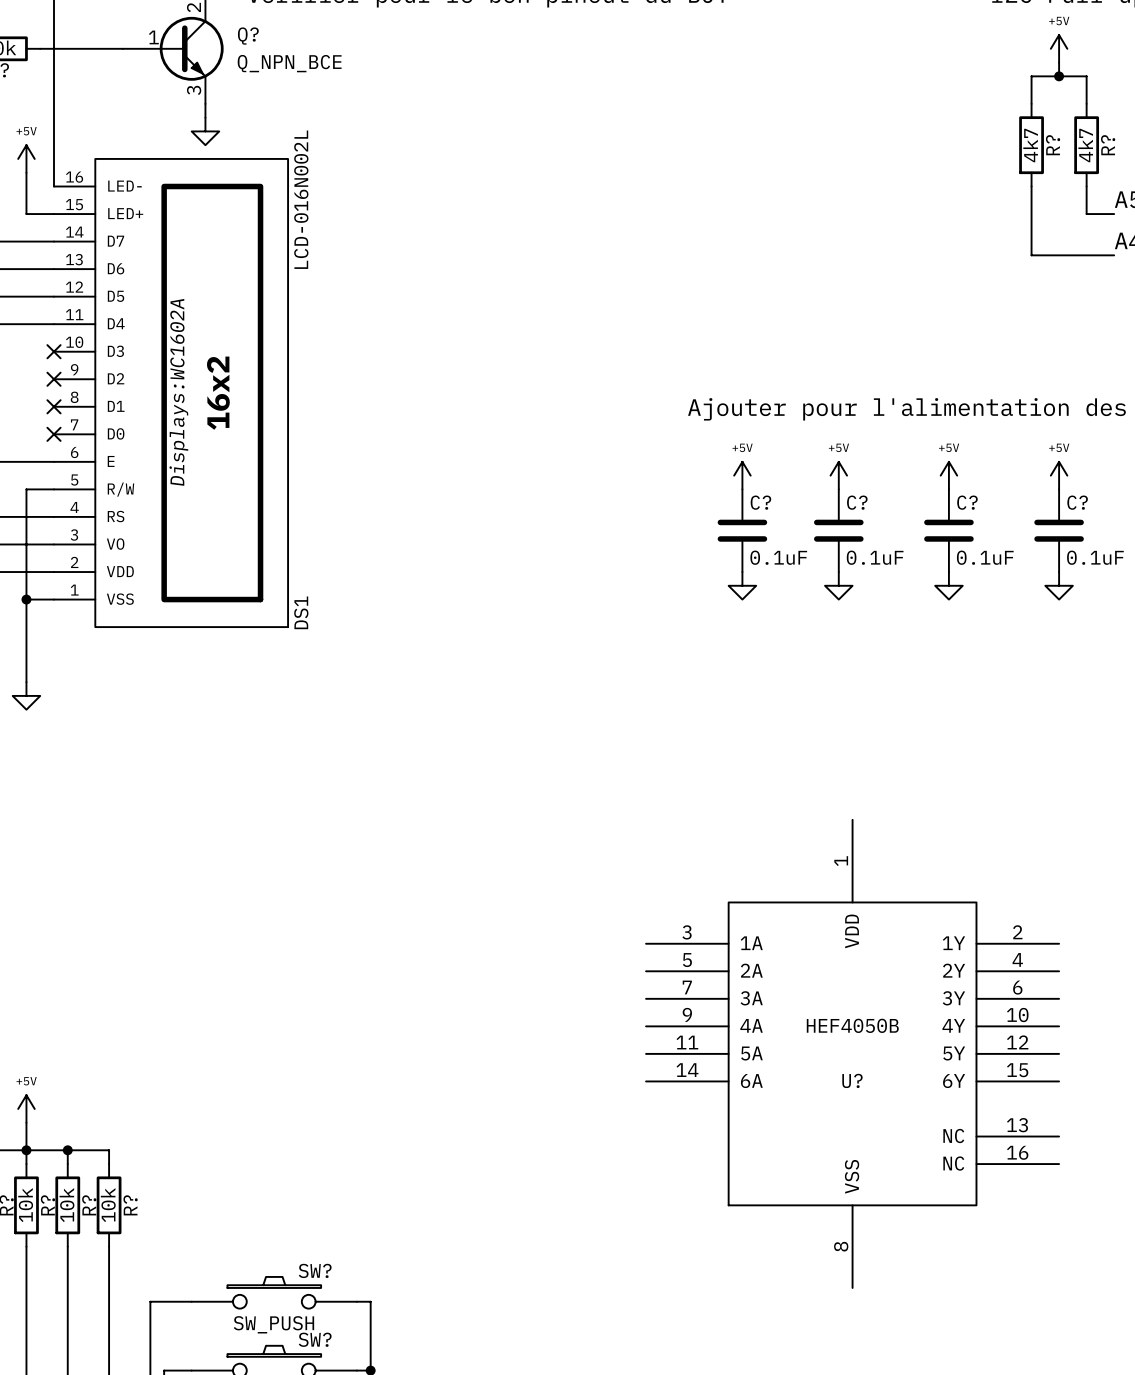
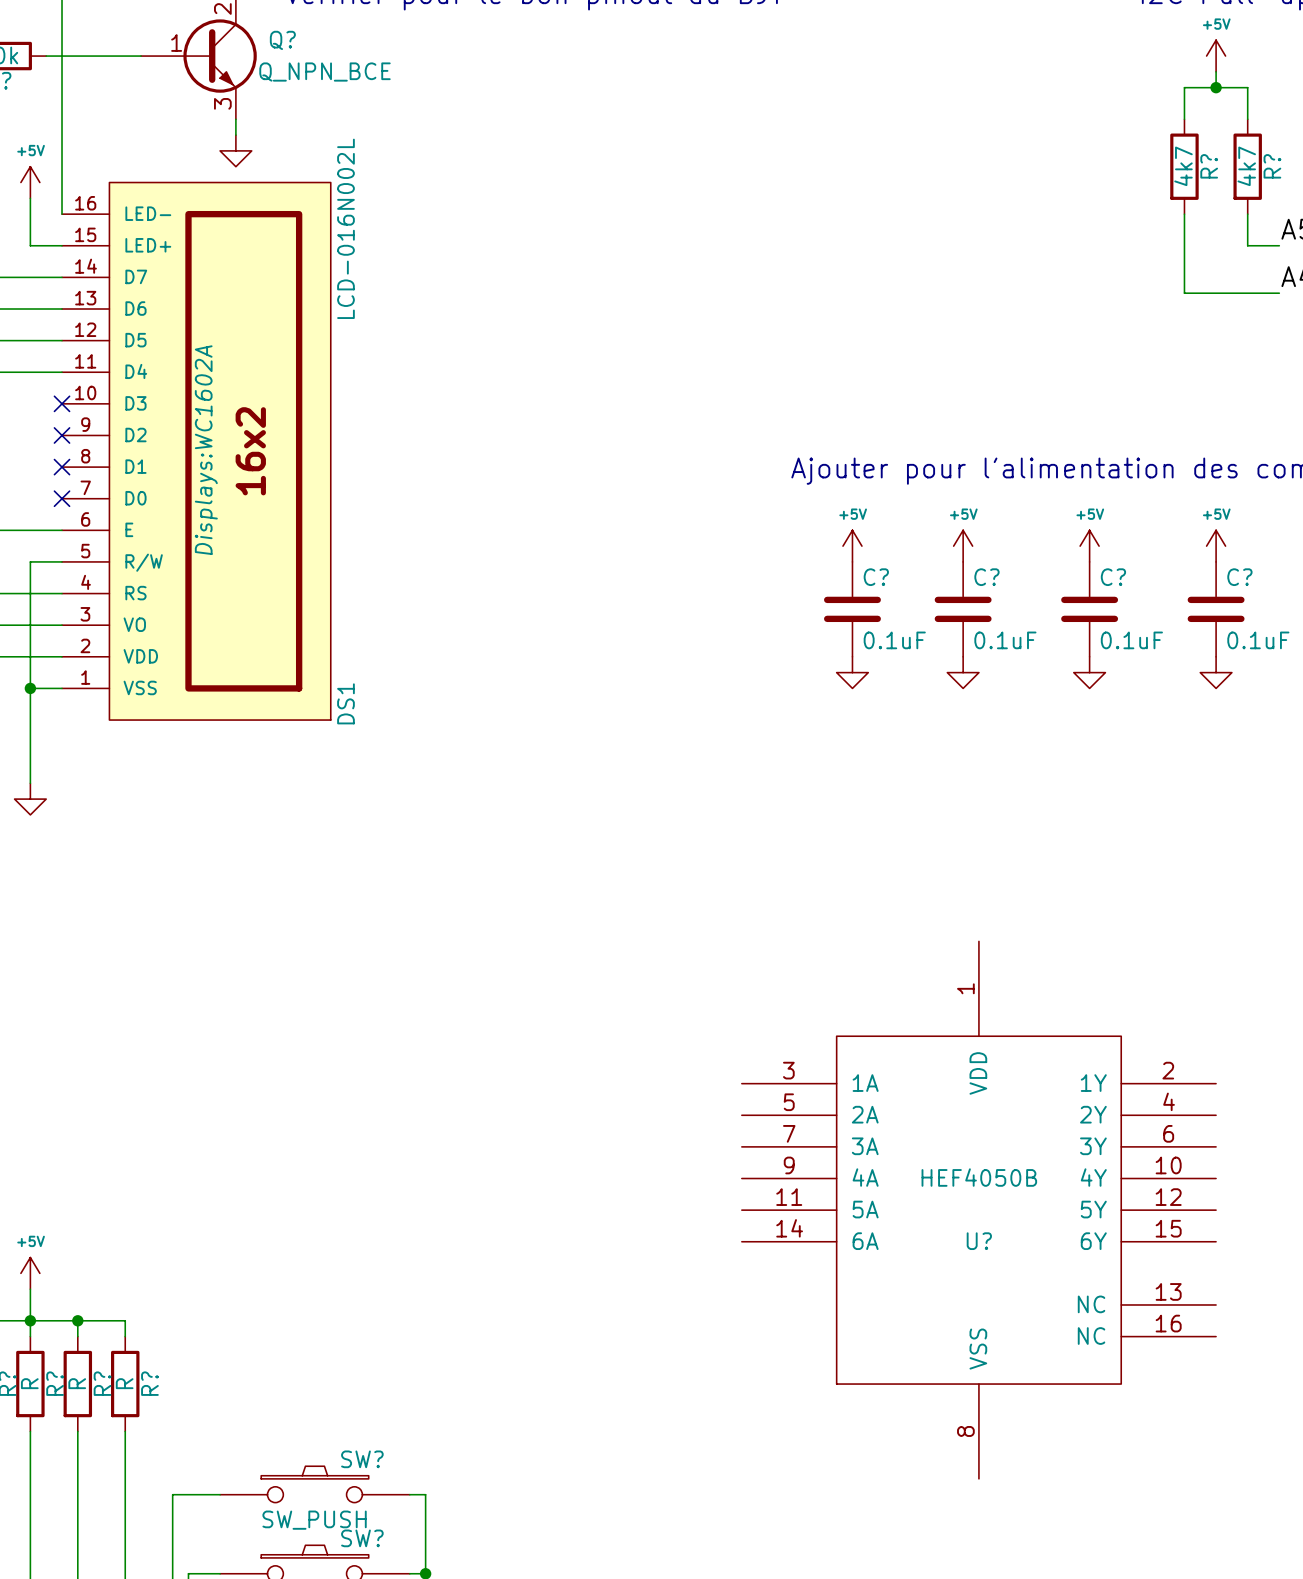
R? value: 10k (25, 1205) -> R (29, 1383)
R? value: 10k (66, 1205) -> R (77, 1383)
R? value: 10k (108, 1205) -> R (124, 1383)

